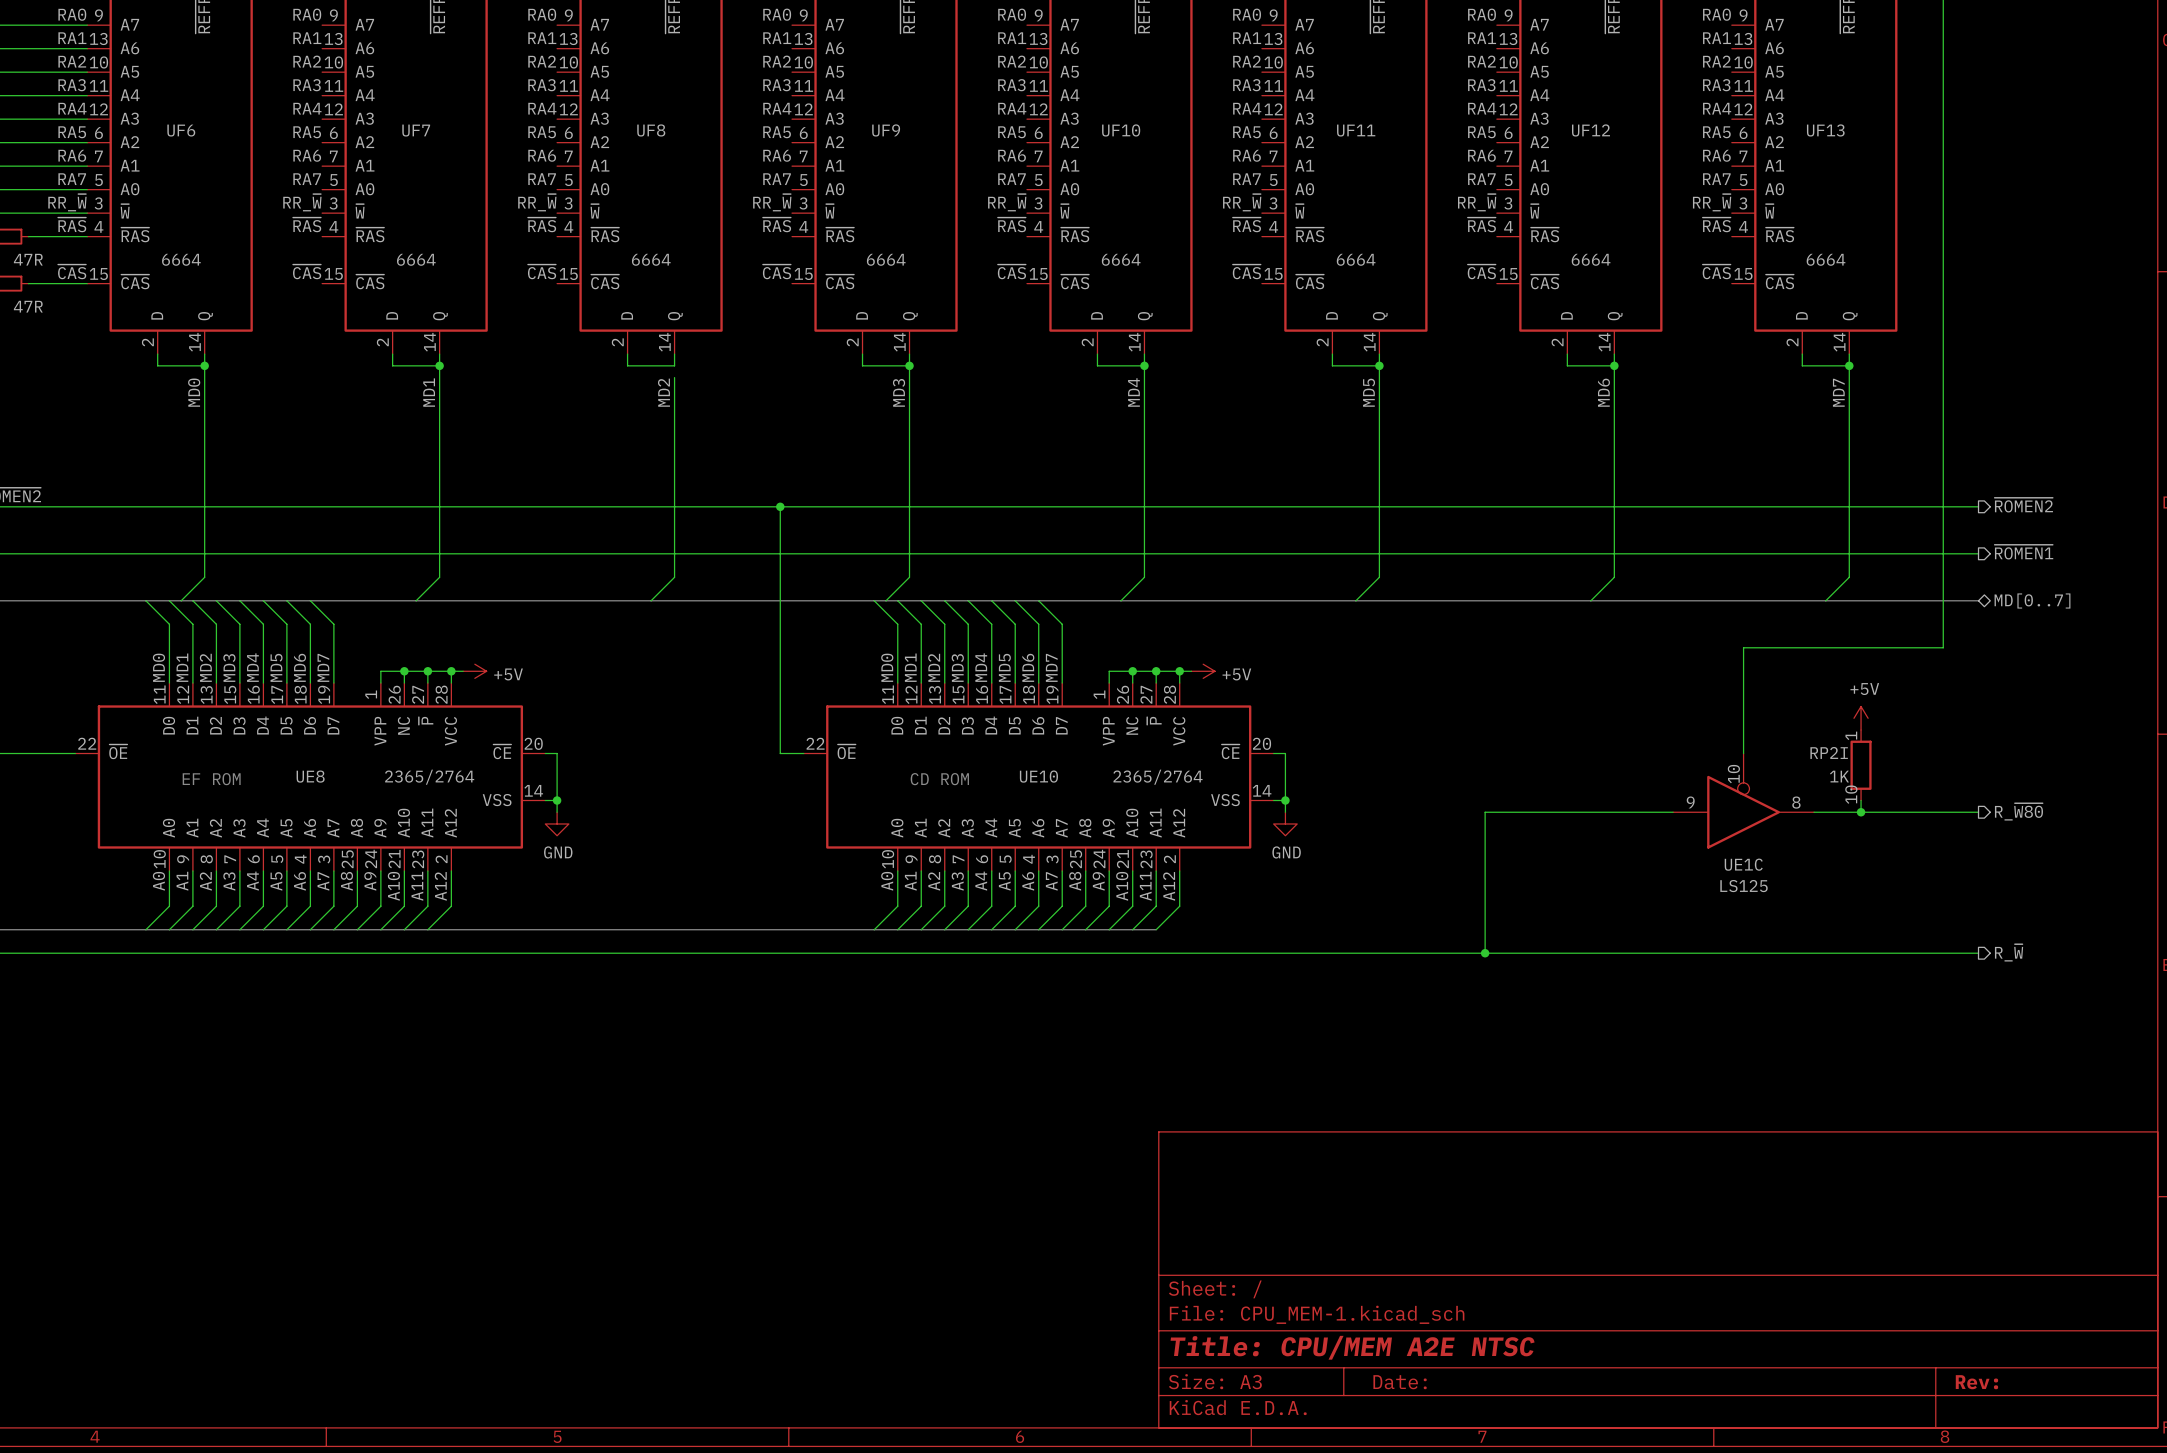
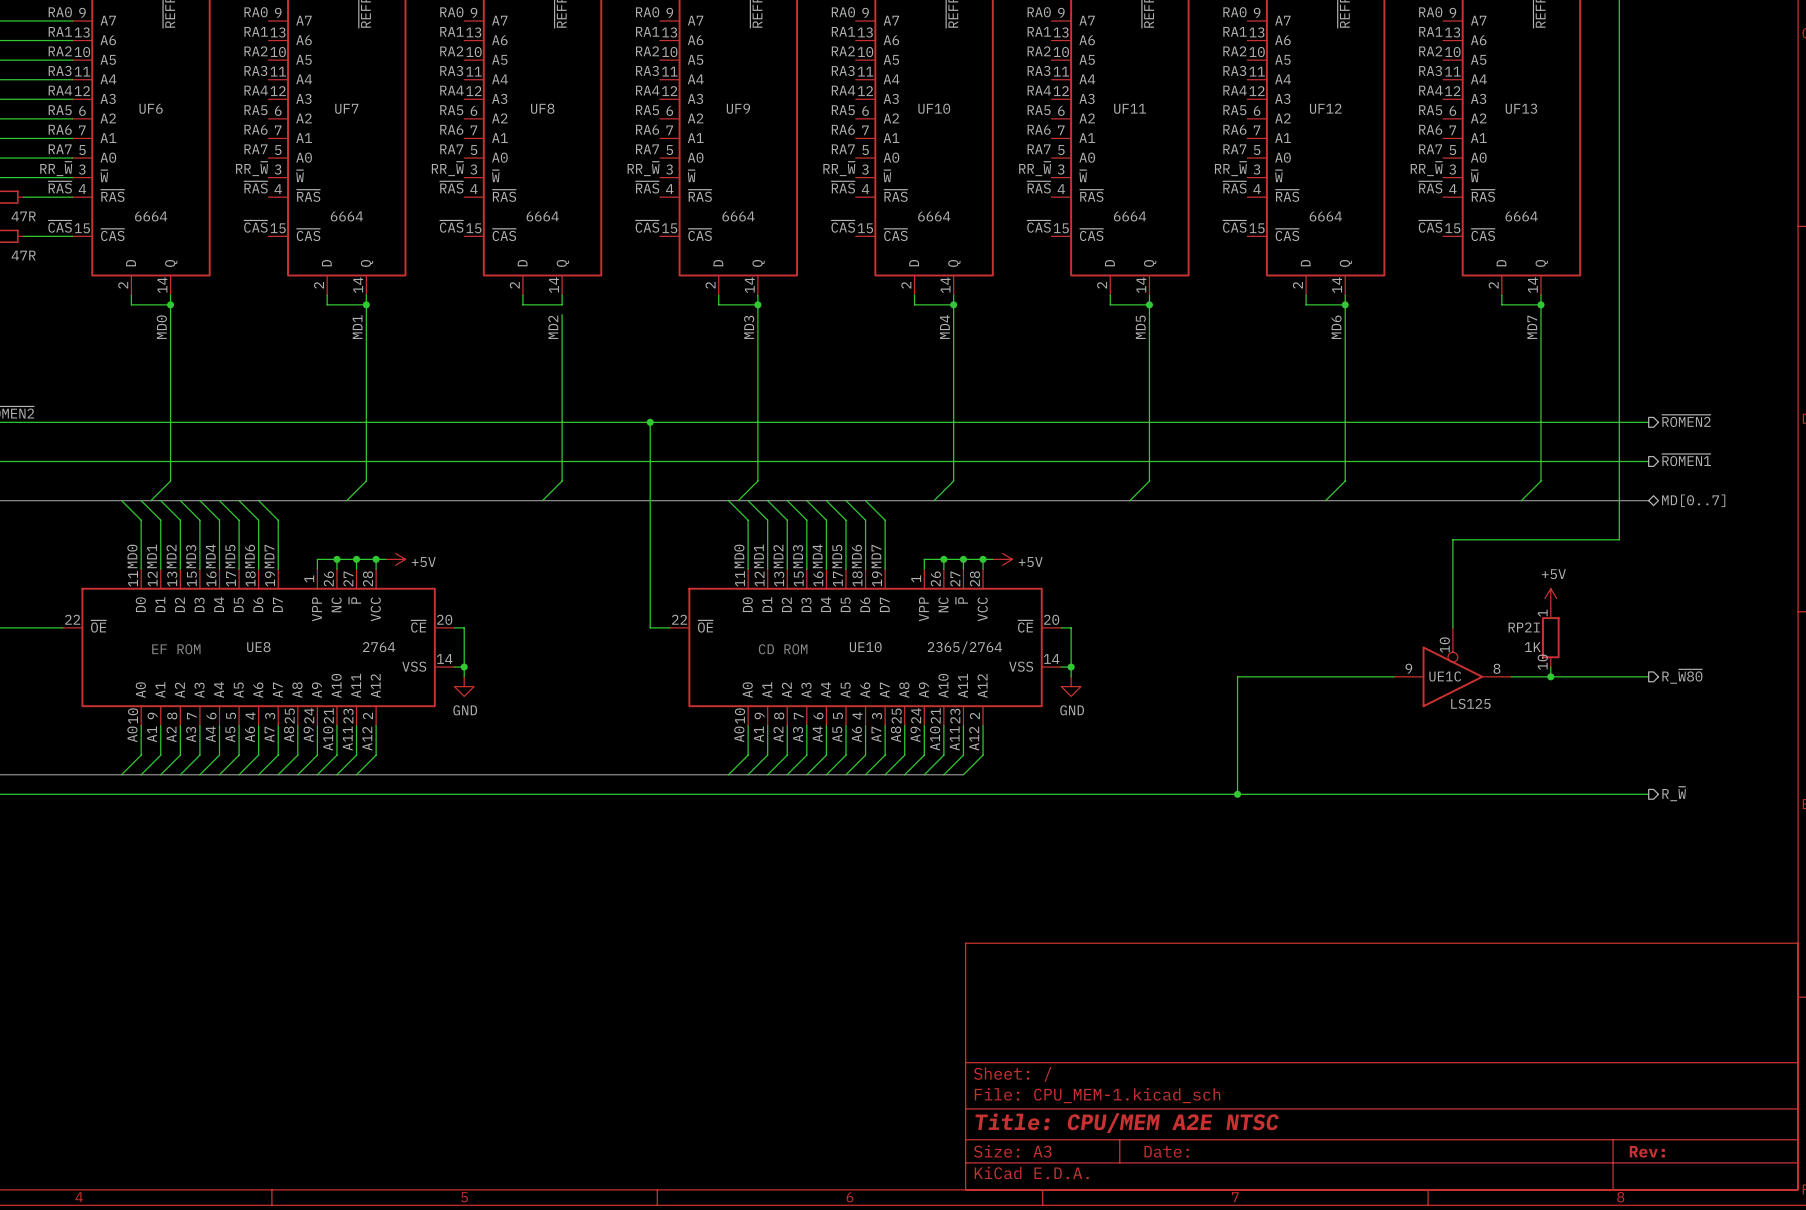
UE8 value: 2365/2764 (429, 777) -> 2764 (379, 647)
UE1C name position: UE1C (1743, 864) -> UE1C (1445, 676)
UE1C value position: LS125 (1744, 886) -> LS125 (1470, 703)

